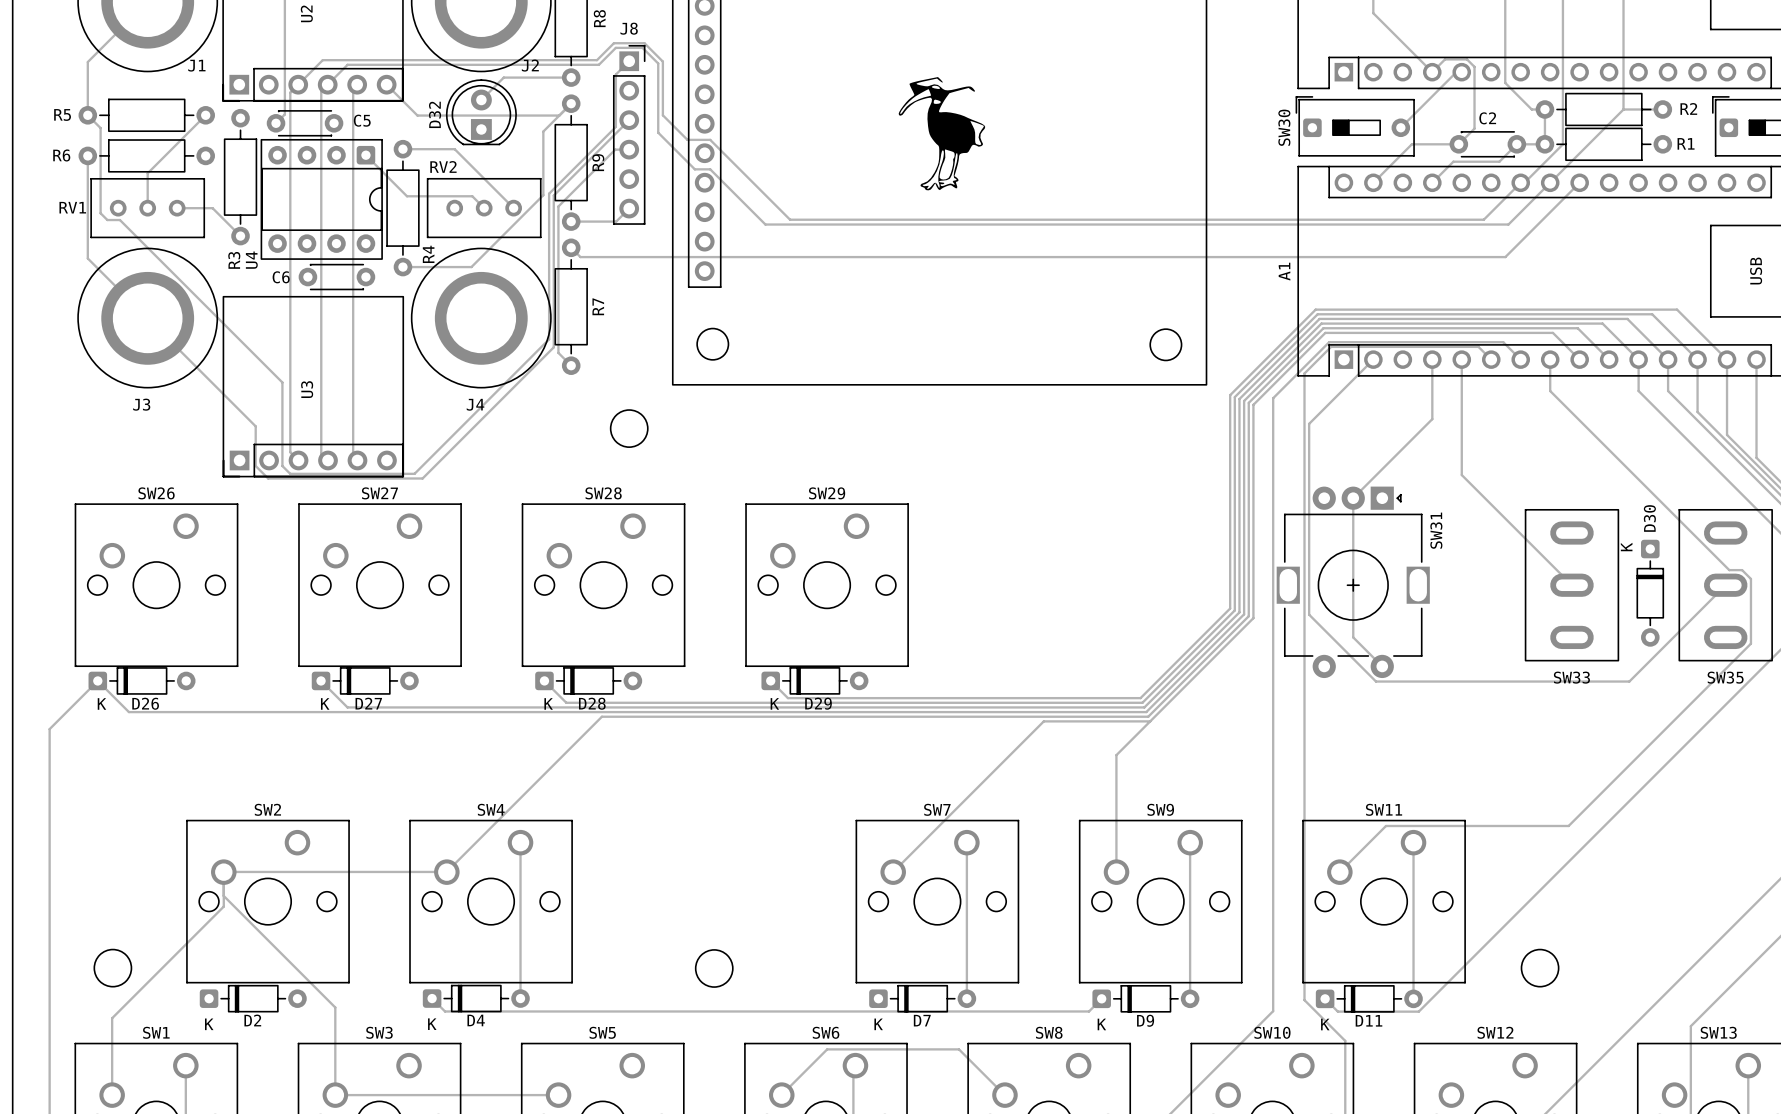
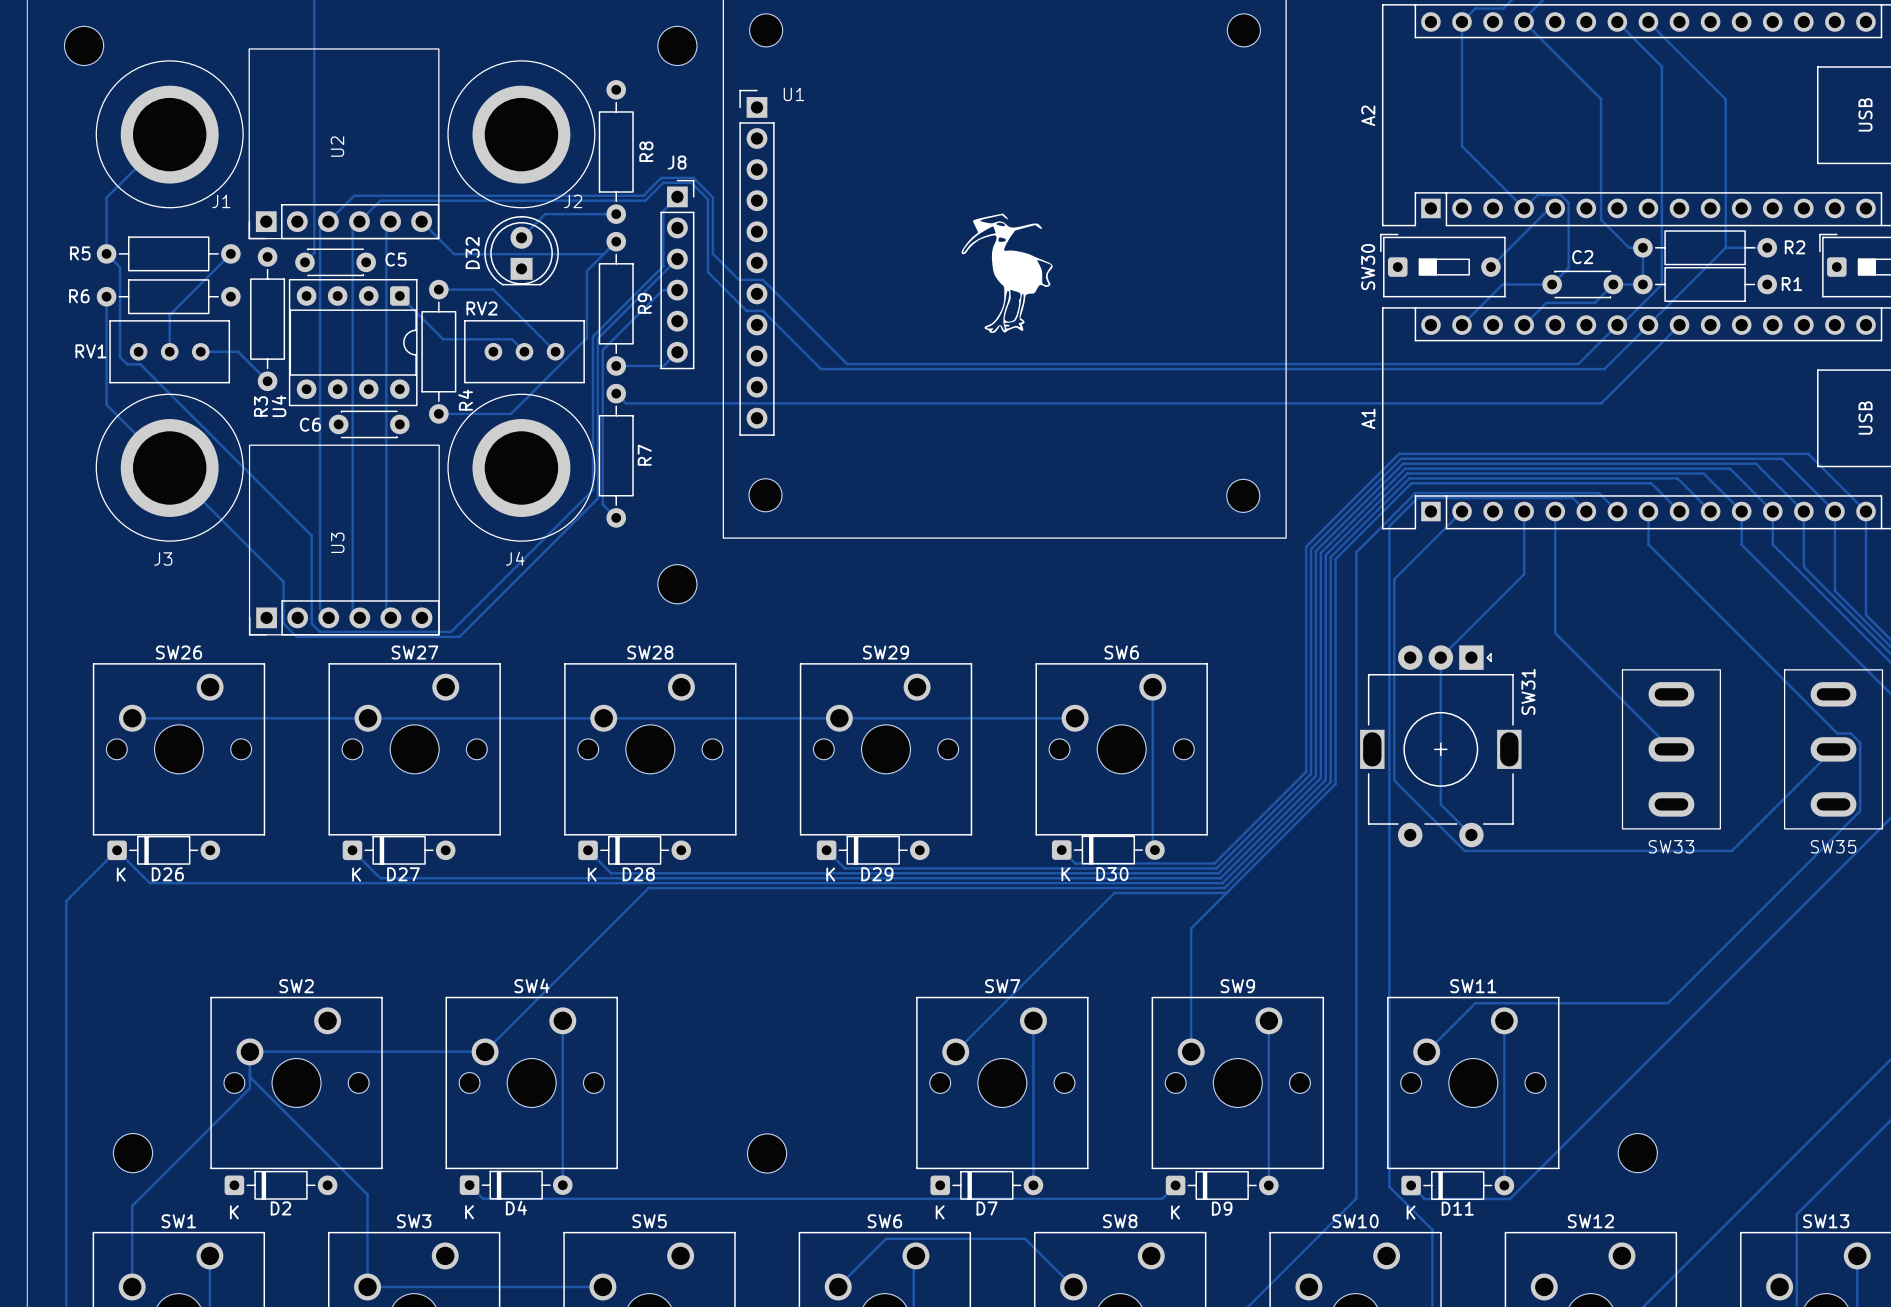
track: none -> (1866, 511) (1808, 453) (1399, 453) (1306, 546) (1306, 771) (1214, 863) (1075, 863) (1061, 850)
D30 name position: D30 (1649, 518) -> D30 (1112, 874)
track: none -> (1152, 687) (1152, 847) (1154, 850)
D30 footprint: [1636, 539, 1664, 647] -> [1051, 835, 1165, 865]
track: none -> (132, 718) (1075, 718)
SW6: none -> (1121, 749)

